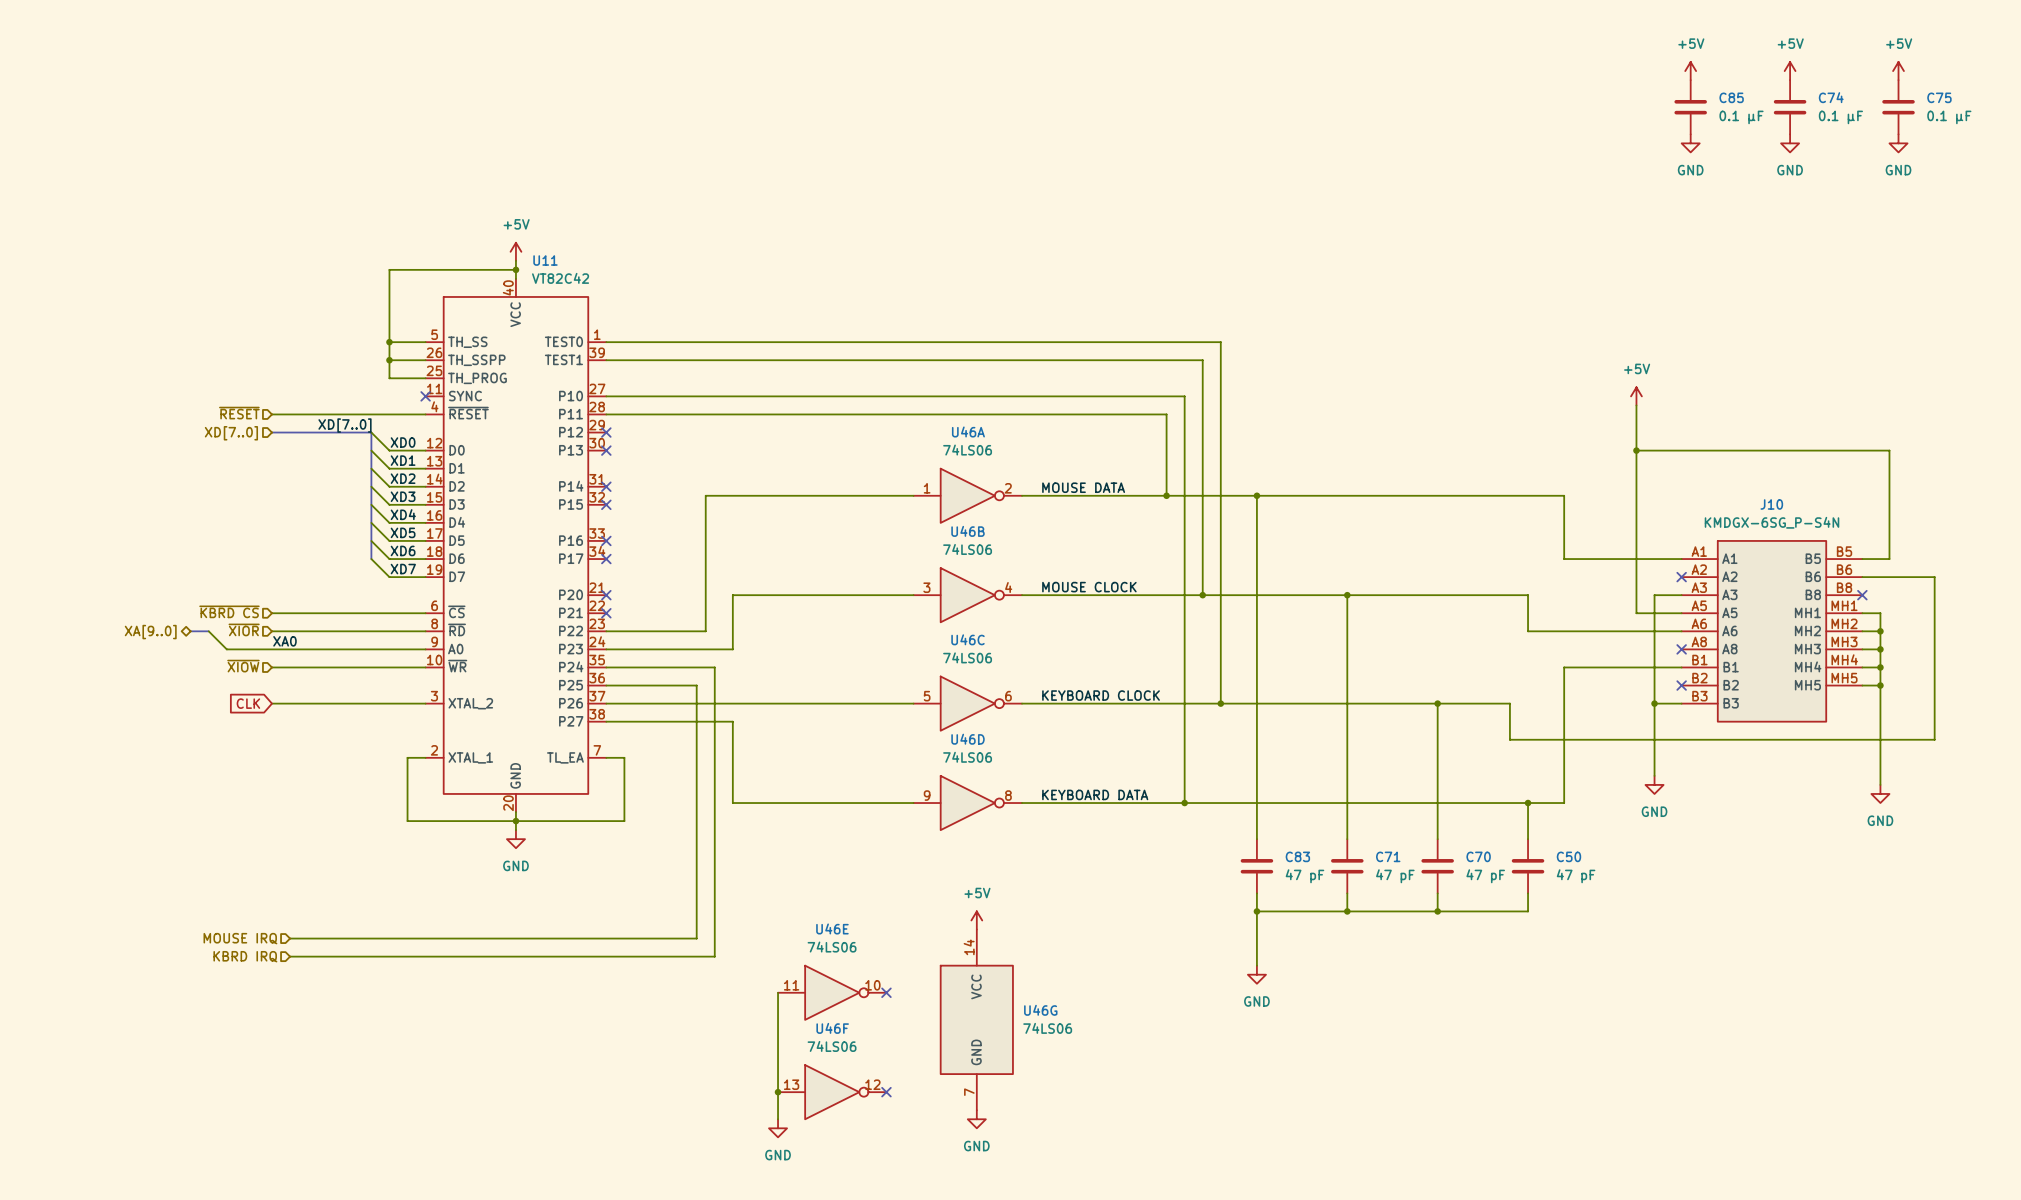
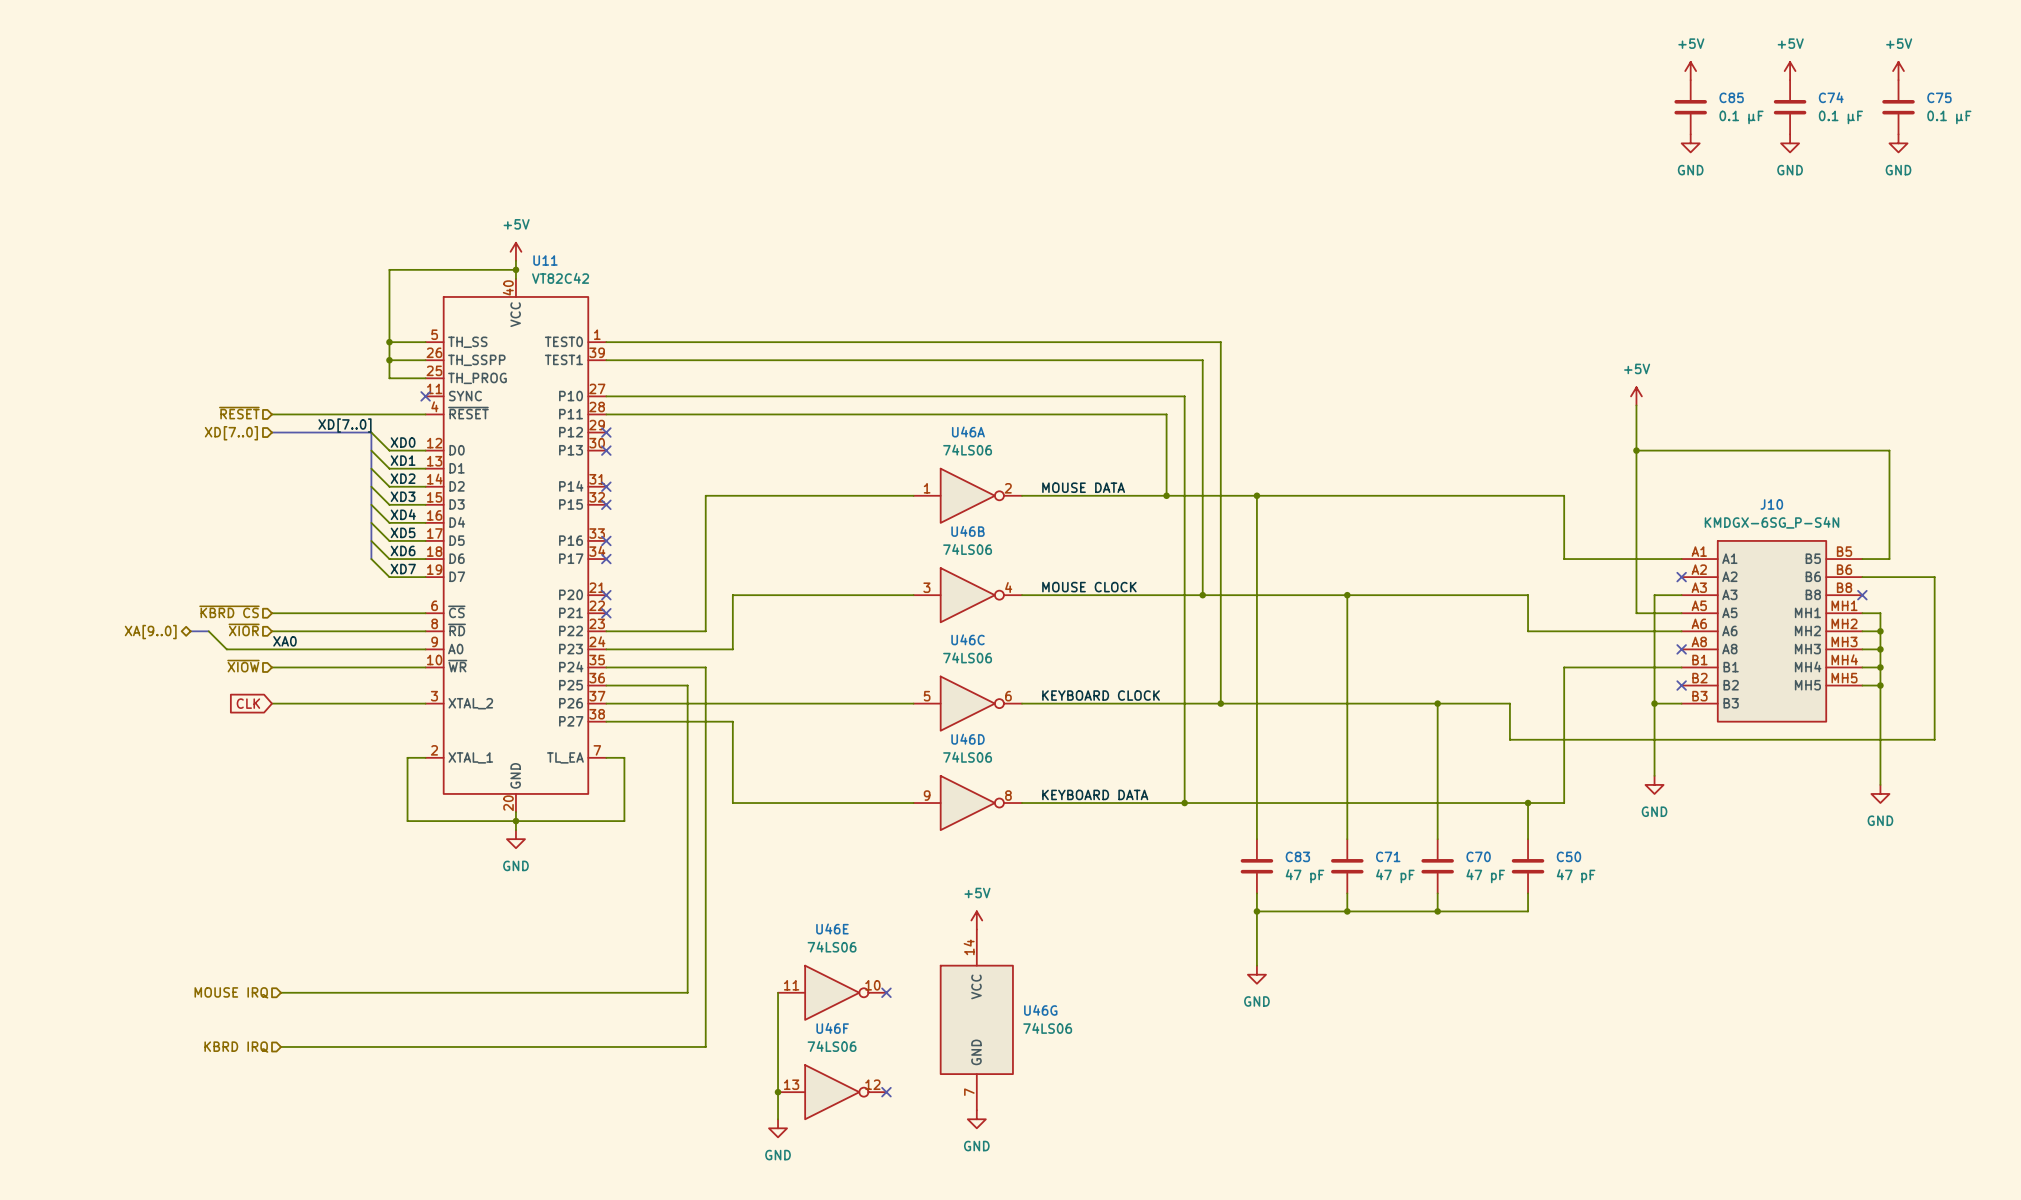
wire: (705, 667) (714, 667) (714, 956) (290, 956) -> (705, 667) (705, 1046) (281, 1046)
wire: (687, 685) (696, 685) (696, 938) (290, 938) -> (687, 685) (687, 992) (281, 992)
hierarchical label position: MOUSE IRQ (240, 938) -> MOUSE IRQ (231, 992)
hierarchical label position: KBRD IRQ (245, 956) -> KBRD IRQ (236, 1047)

